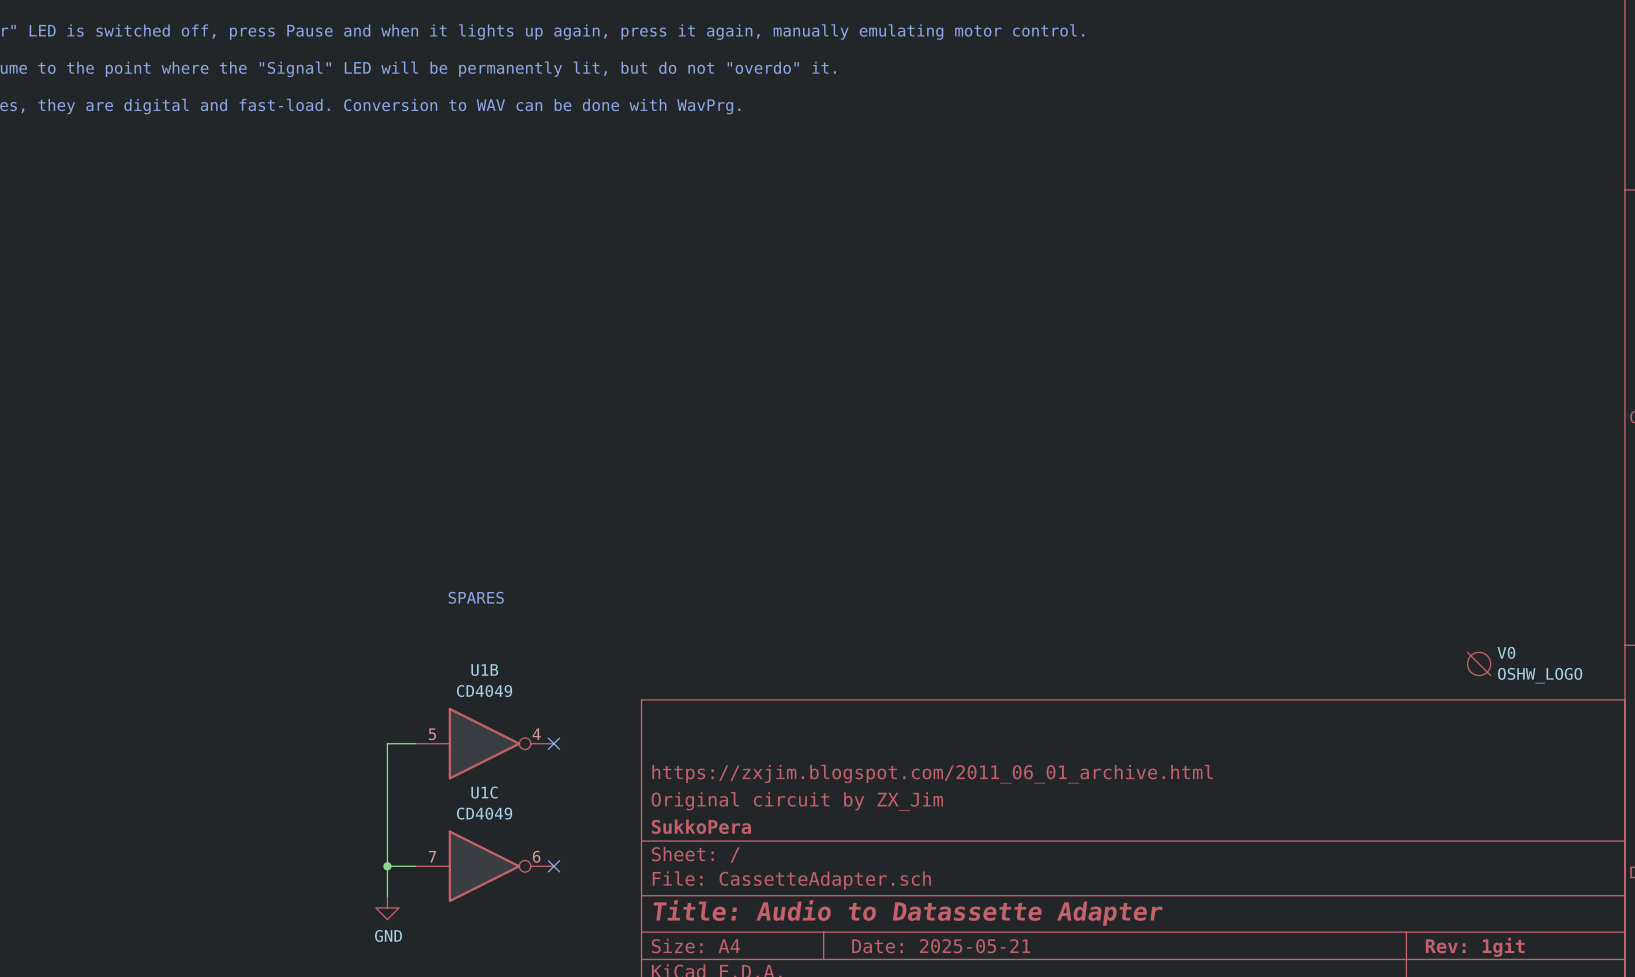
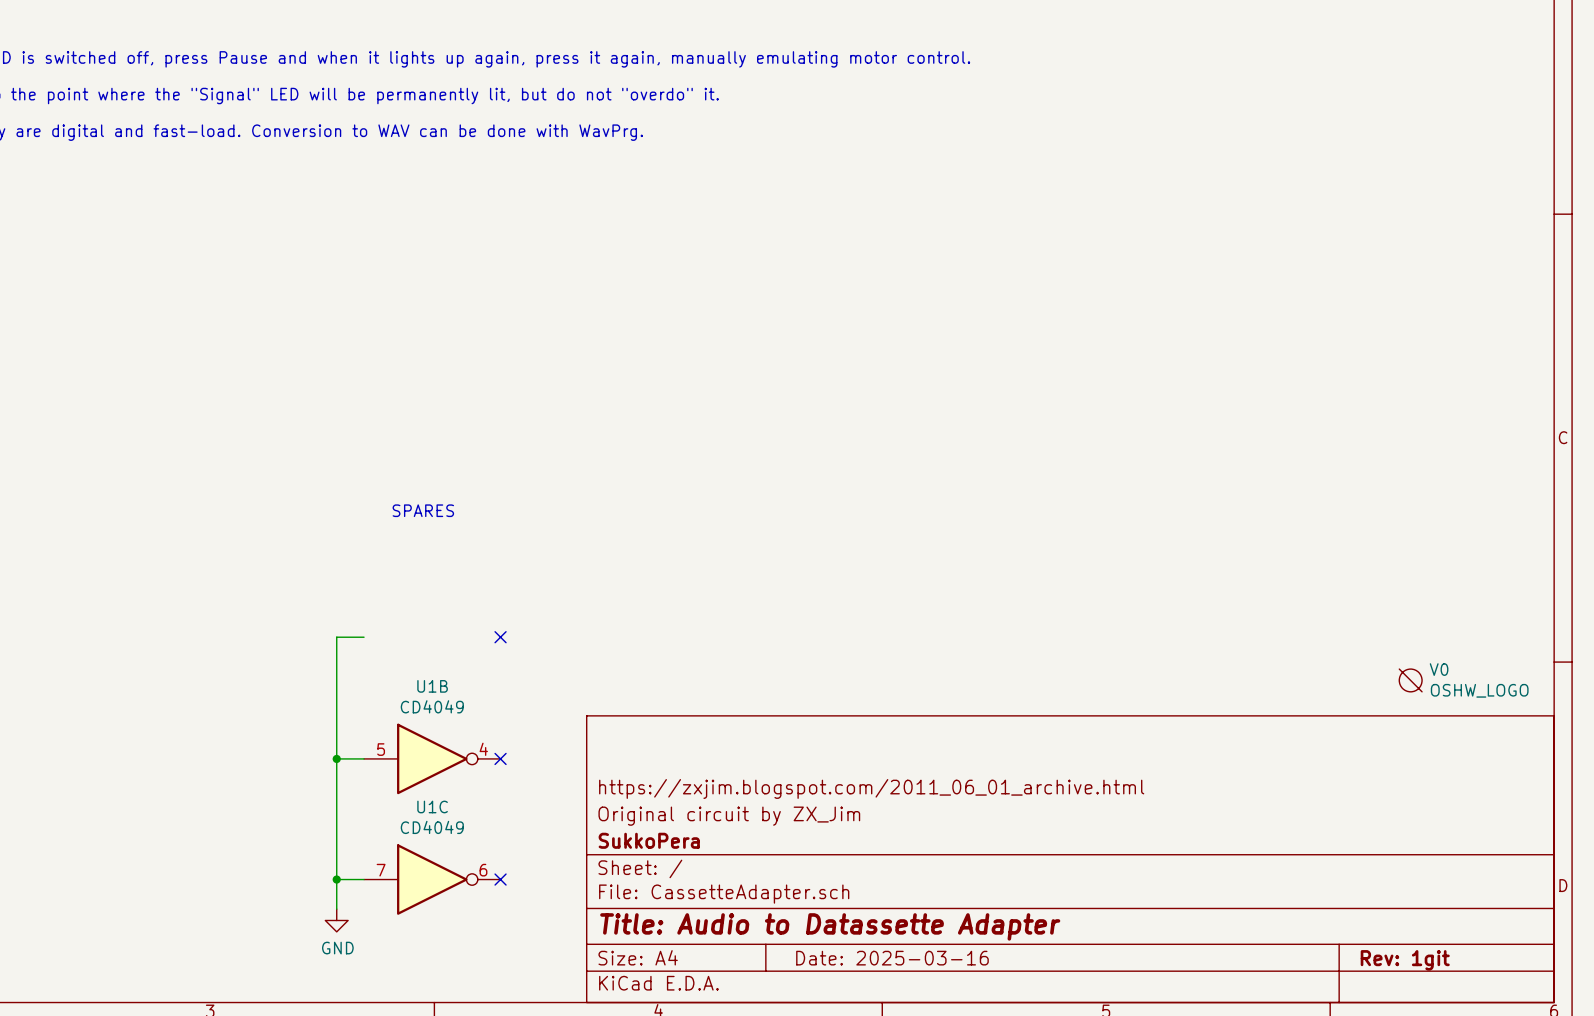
text position: SPARES (476, 597) -> SPARES (423, 510)
wire: none -> (364, 637) (336, 637) (336, 758)
no-connect mark: none -> (500, 637)
junction: none -> (336, 758)
title block: Date: 2025-05-21 (941, 946) -> Date: 2025-03-16 (892, 958)

